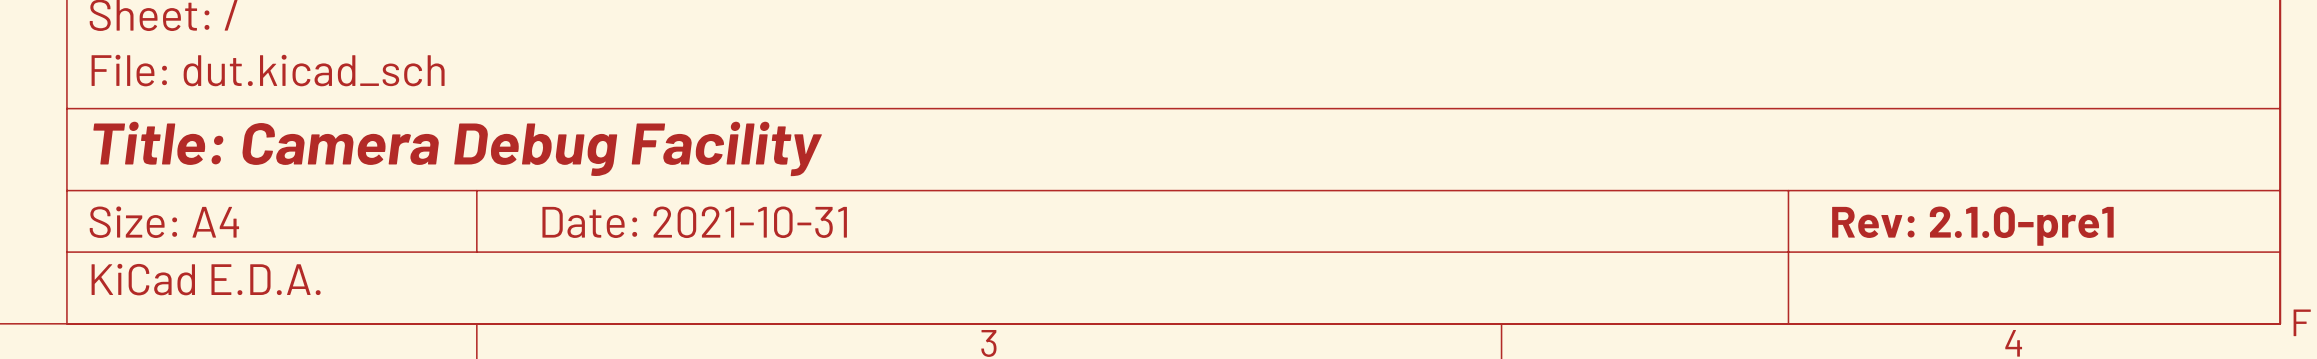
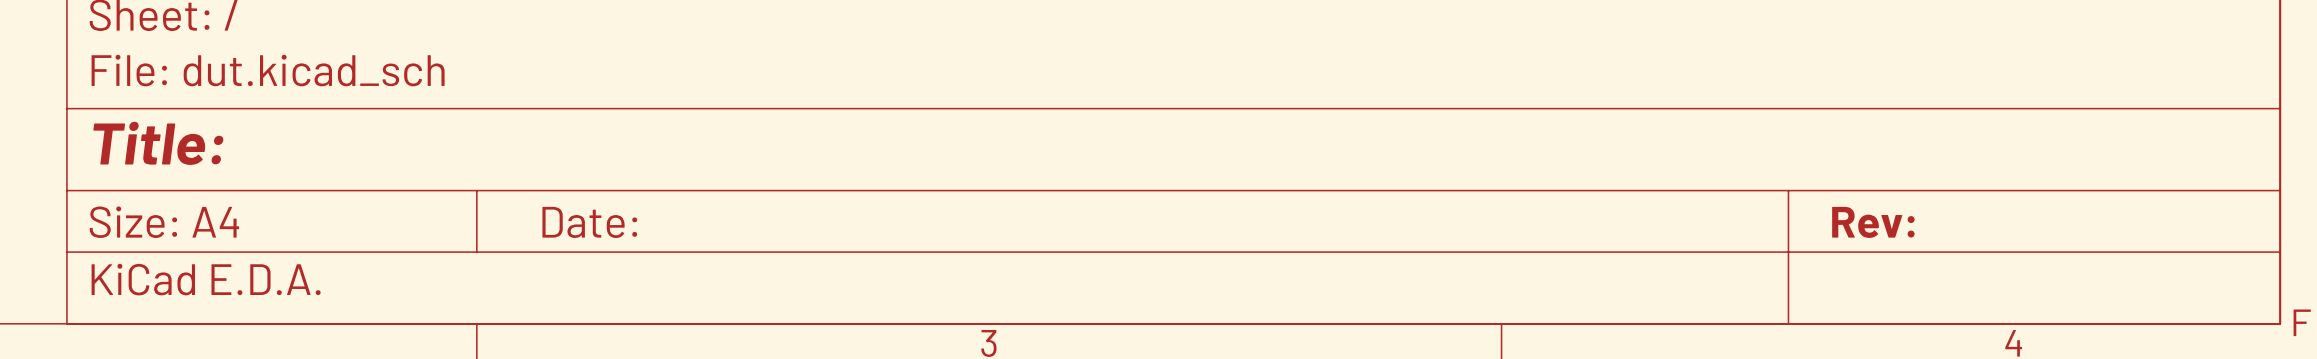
title block: Title: Camera Debug Facility (457, 148) -> Title: (158, 143)
title block: Date: 2021-10-31 (694, 222) -> Date: (589, 222)
title block: Rev: 2.1.0-pre1 (1972, 226) -> Rev: (1873, 222)

